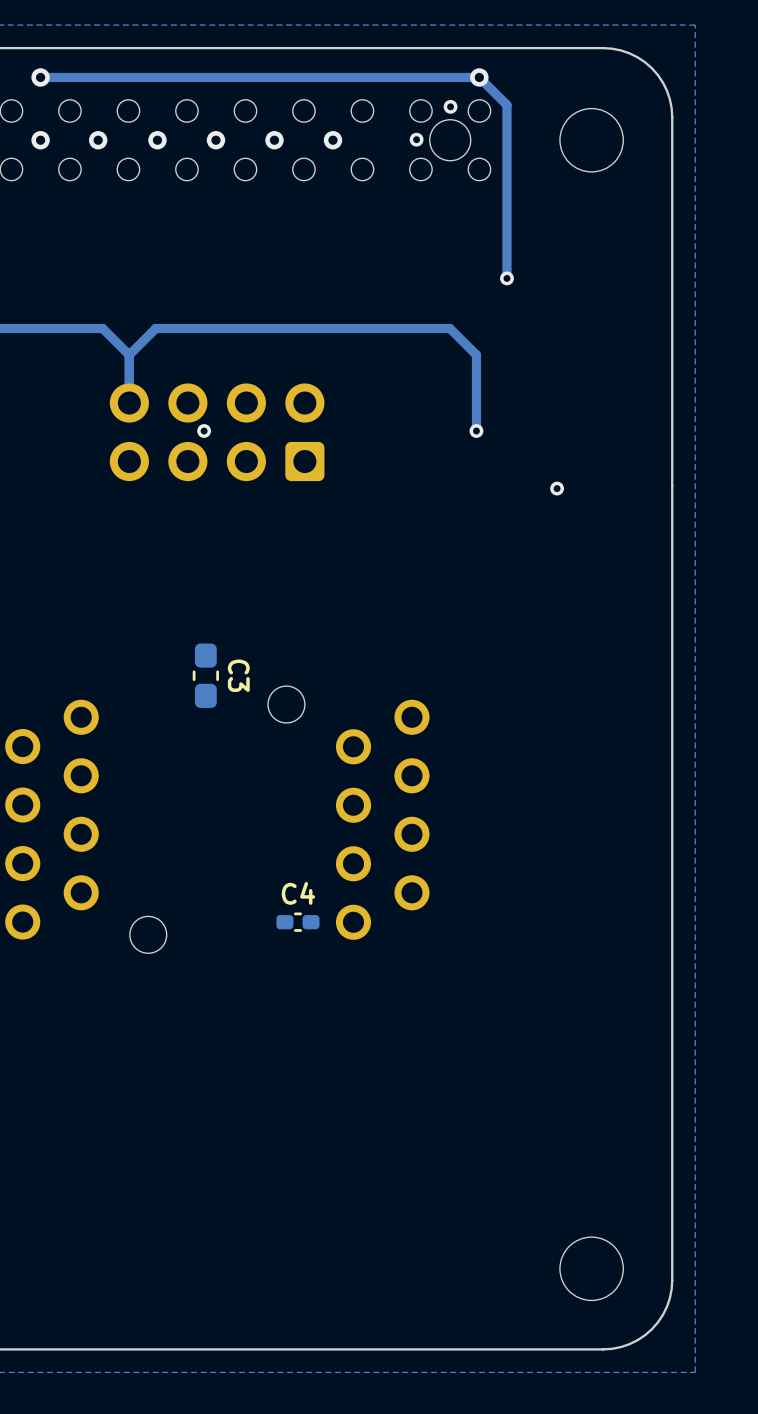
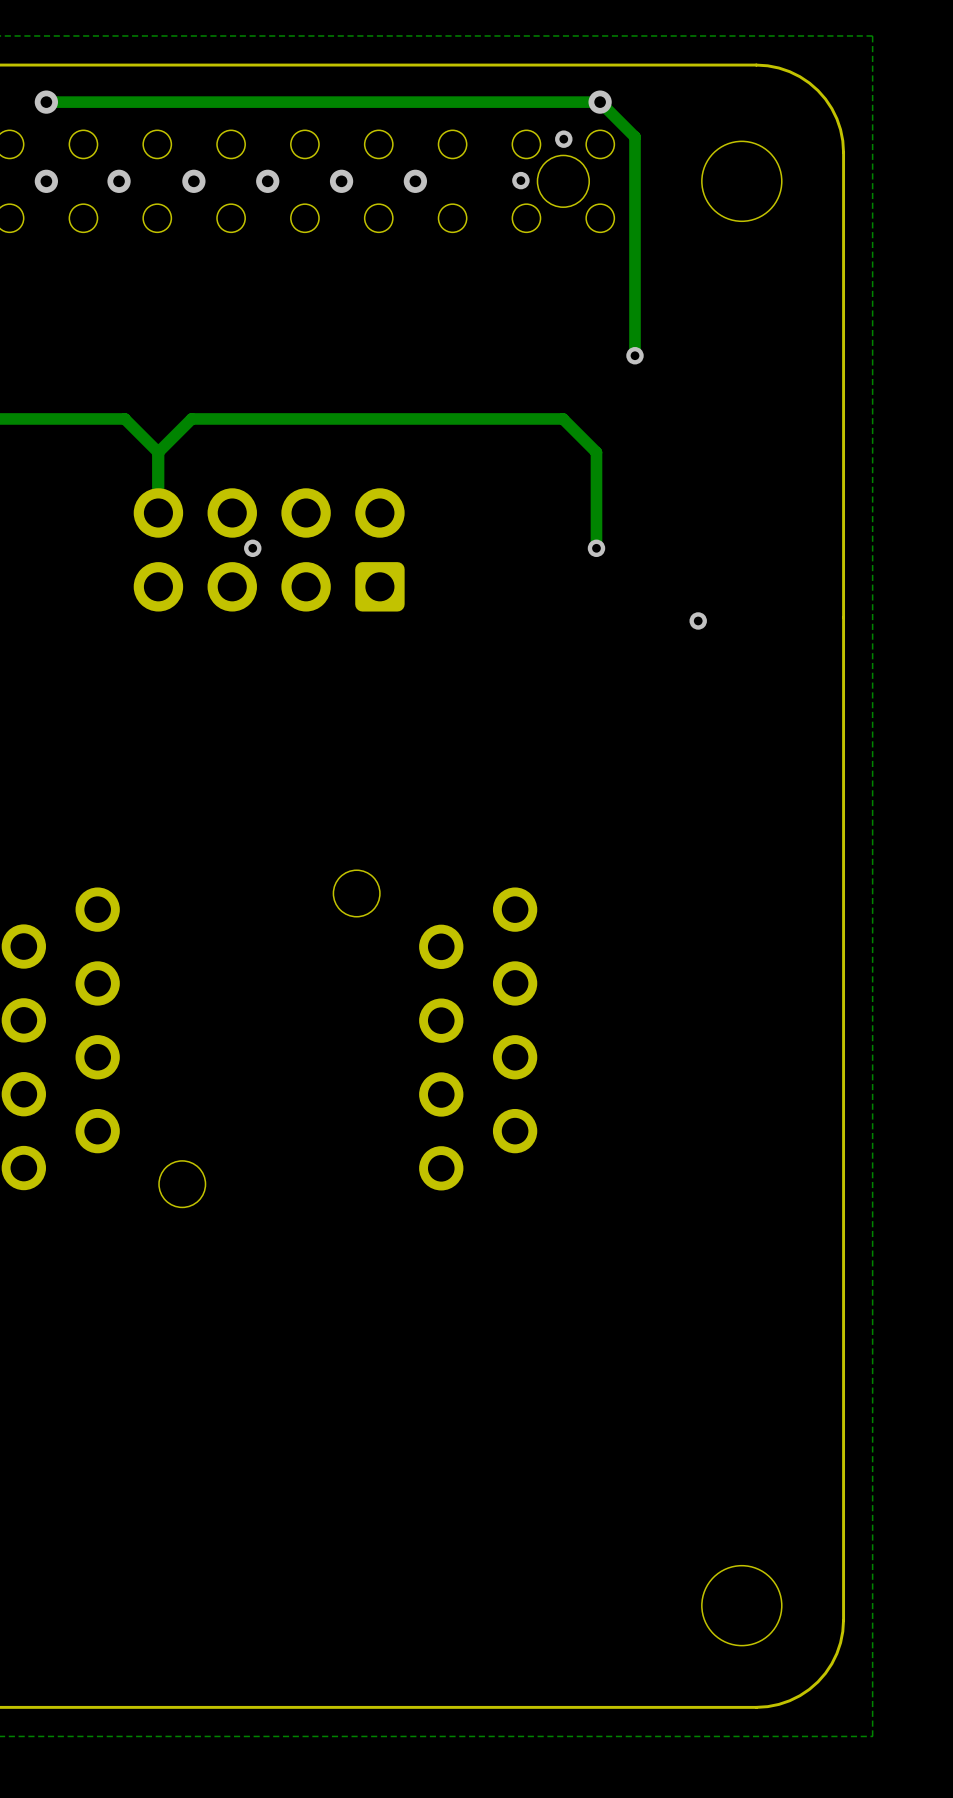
C3: (205, 675) -> none
C4: (297, 922) -> none

